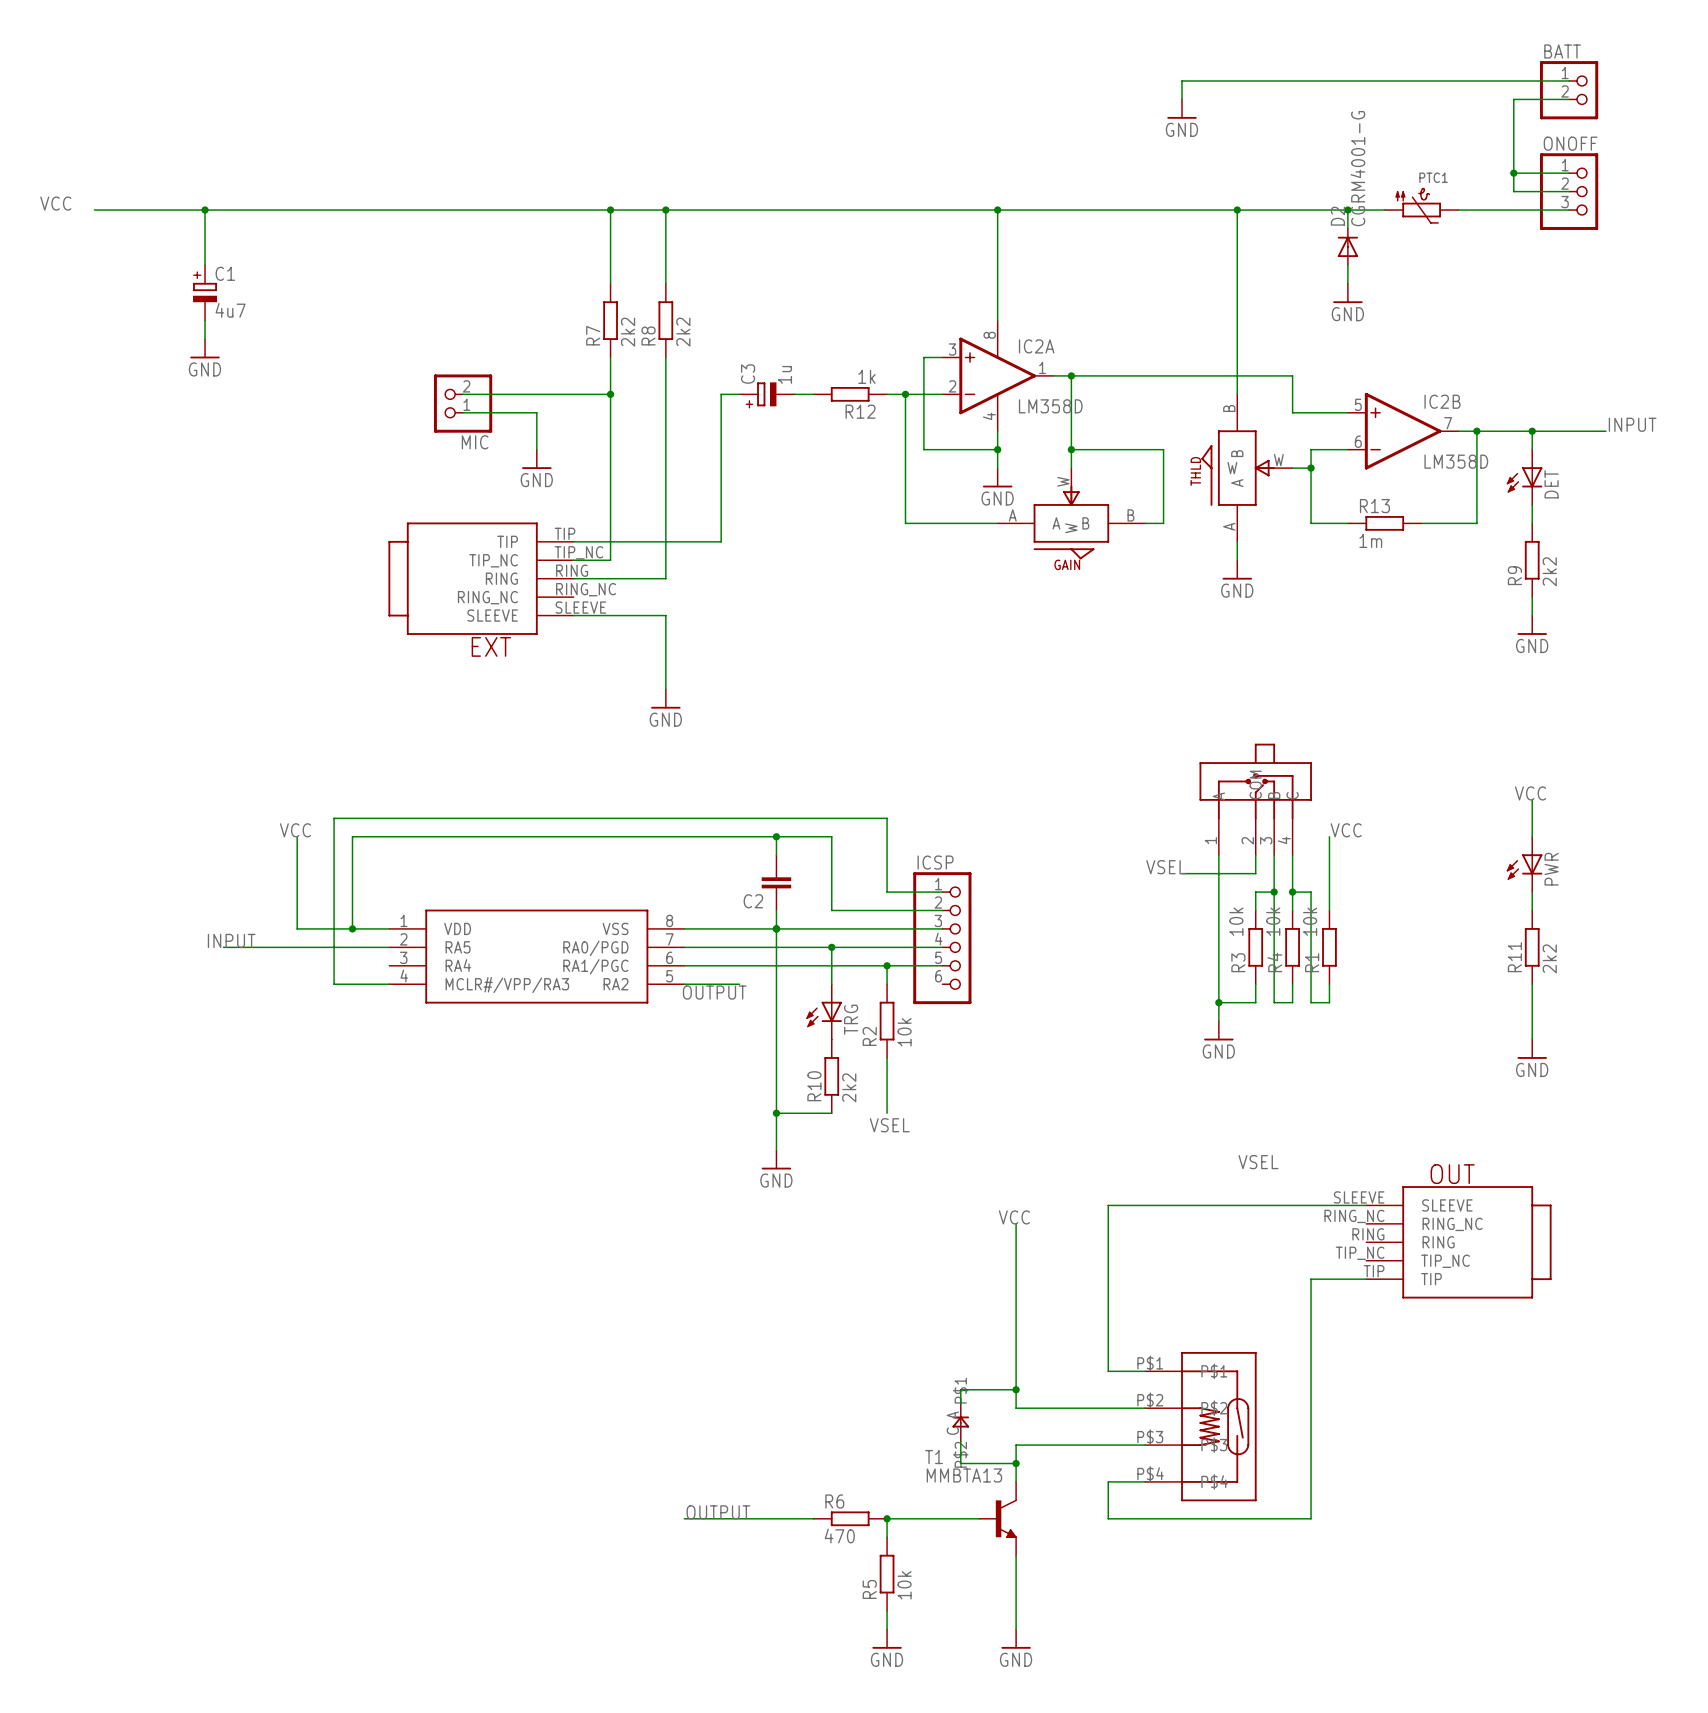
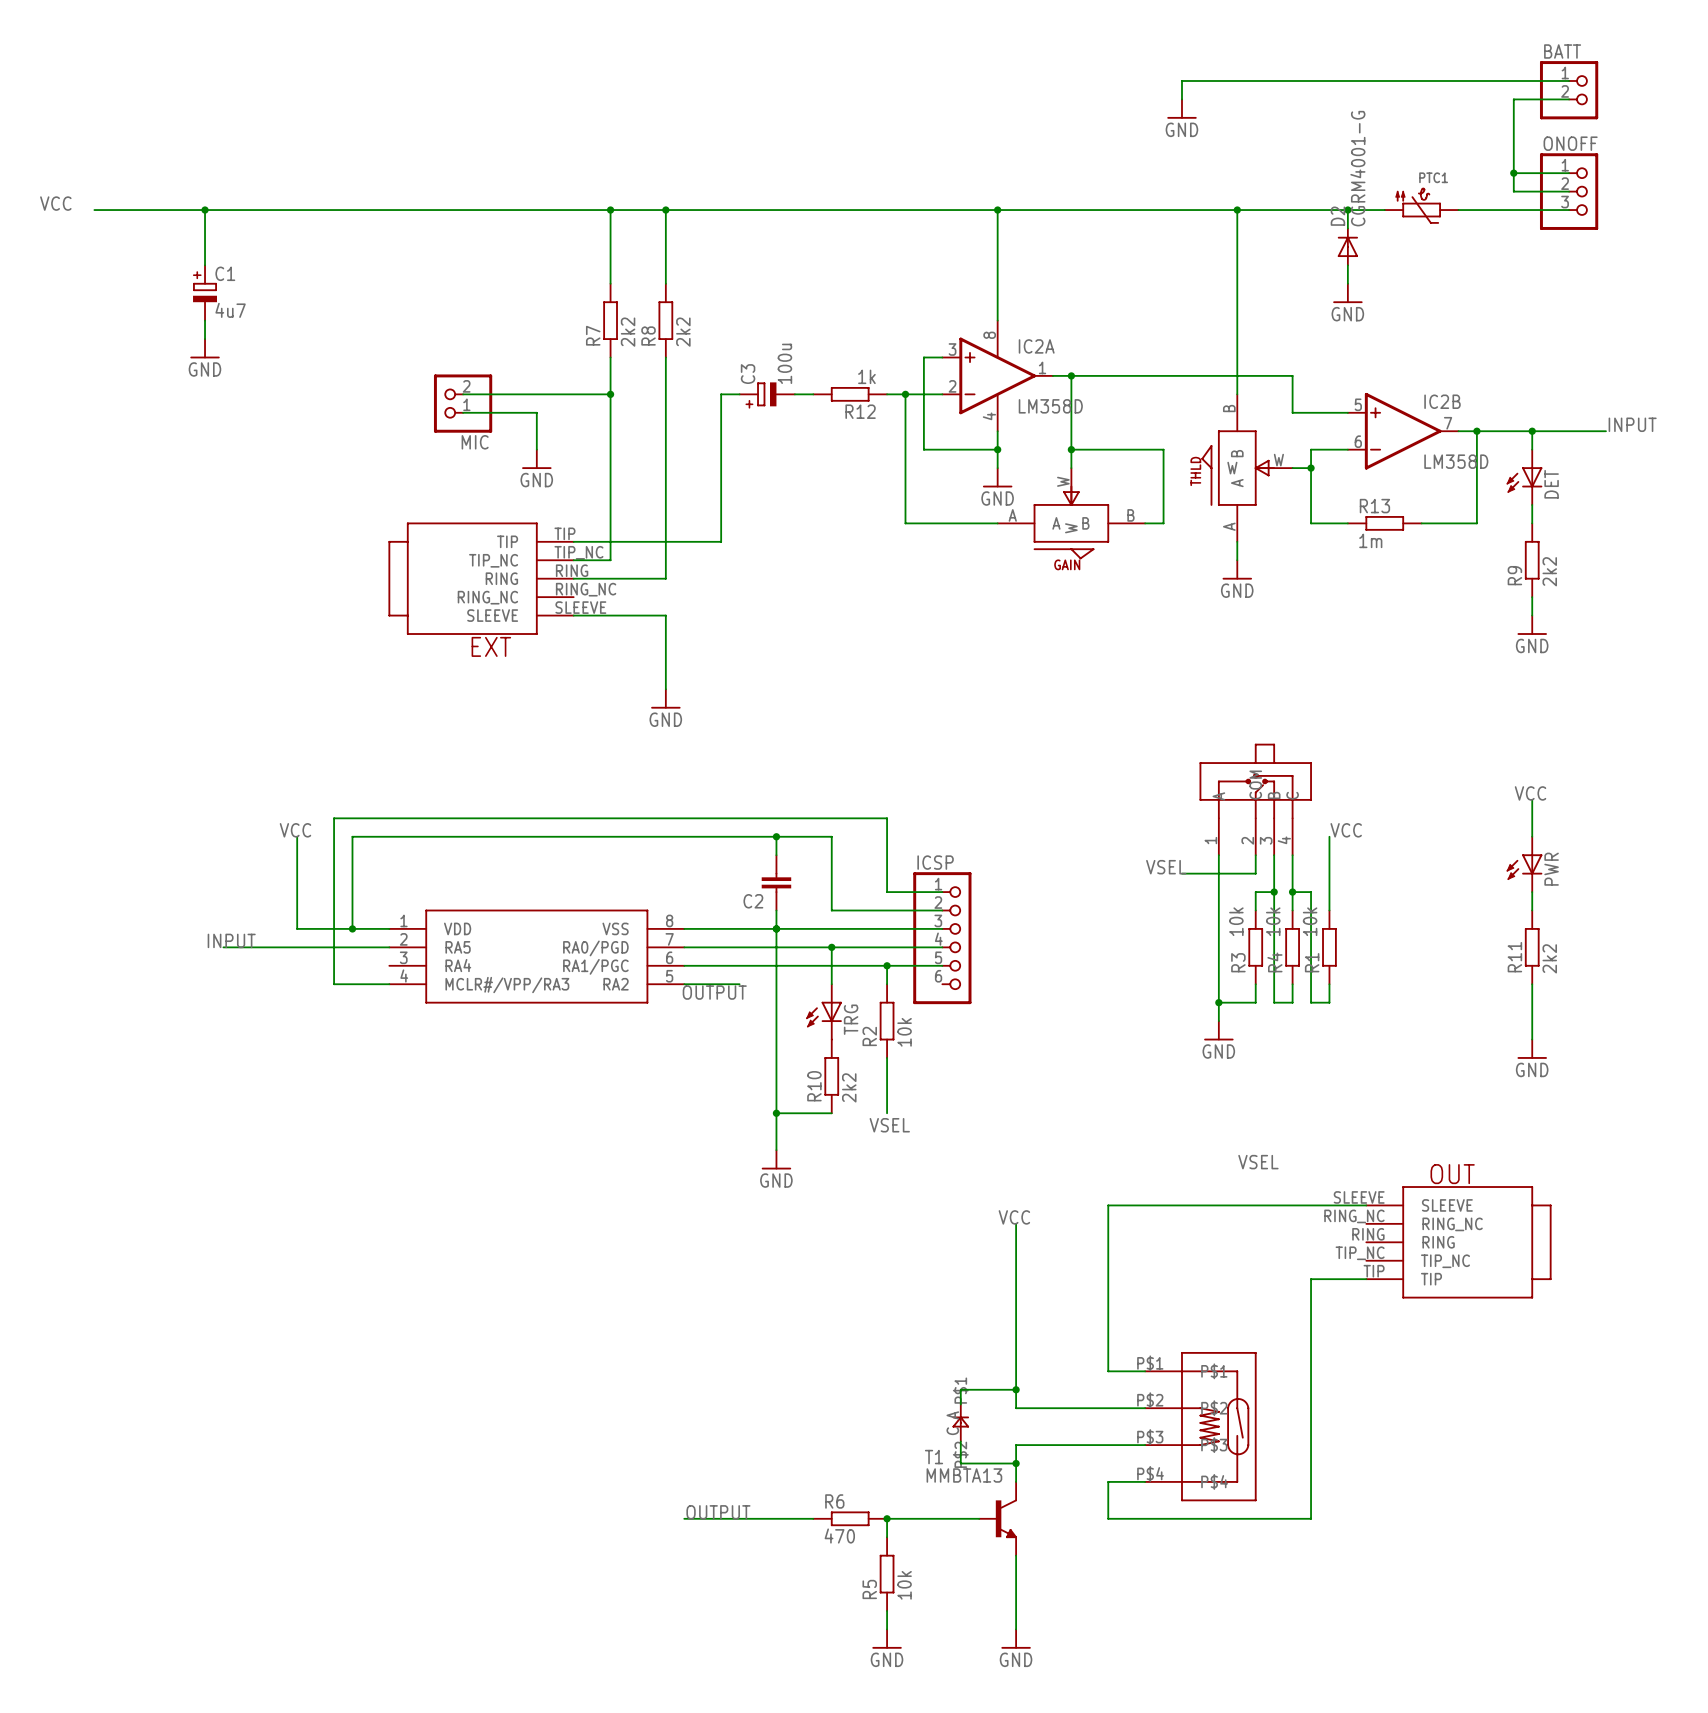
C3 value: 1u (784, 374) -> 100u (784, 363)

